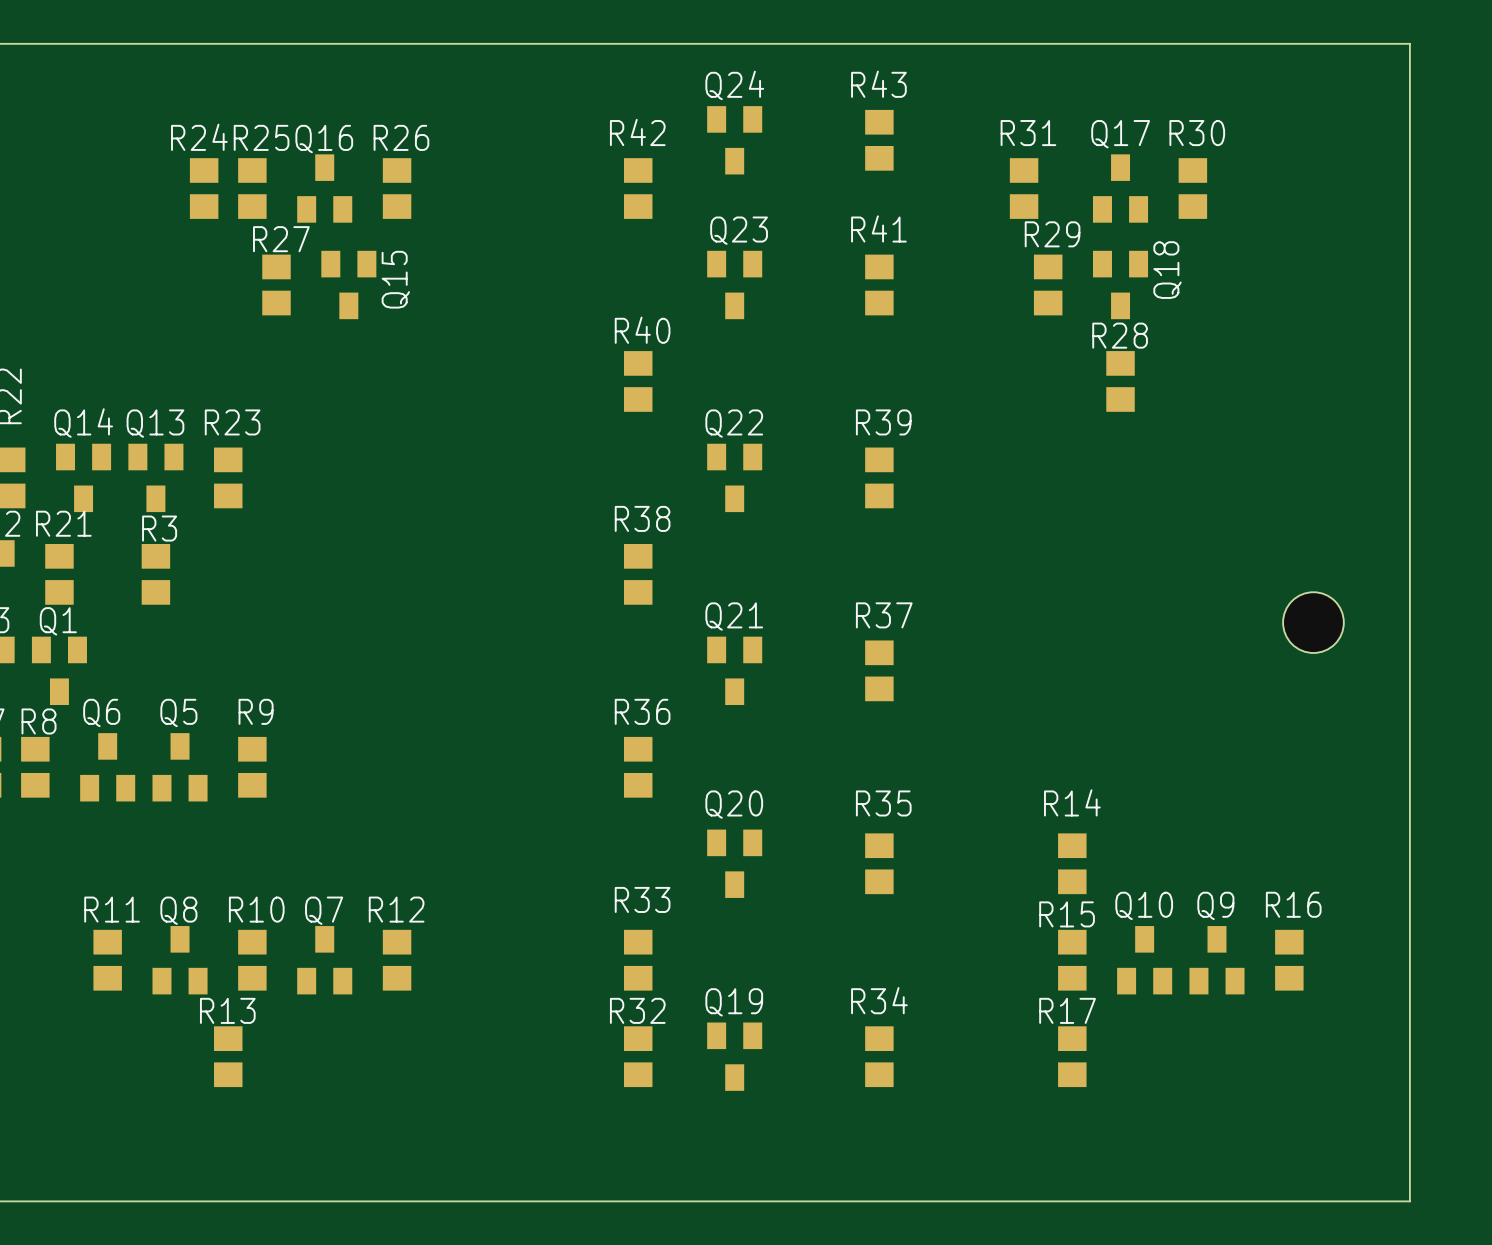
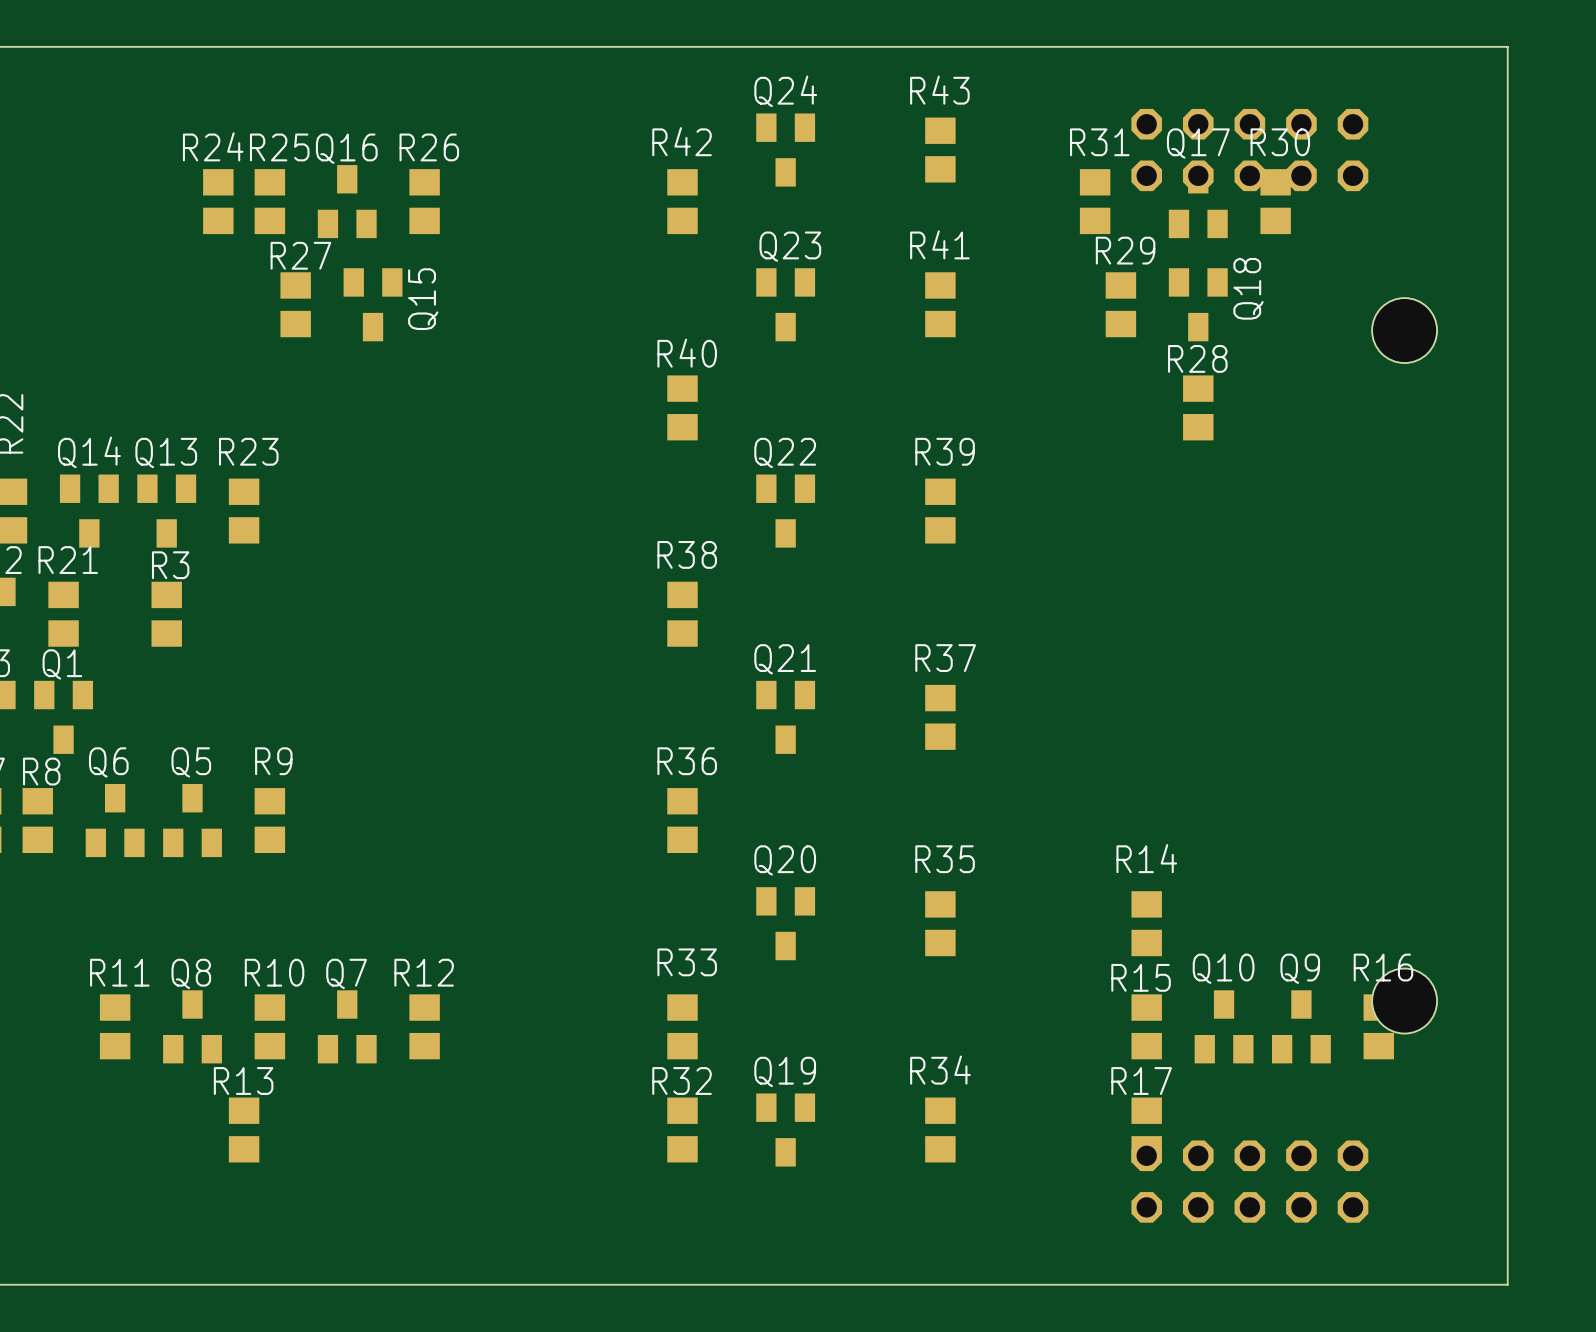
part: none -> (1249, 150)
part: none -> (1404, 330)
part: (1313, 622) -> none
part: none -> (1404, 1001)
part: none -> (1249, 1181)

